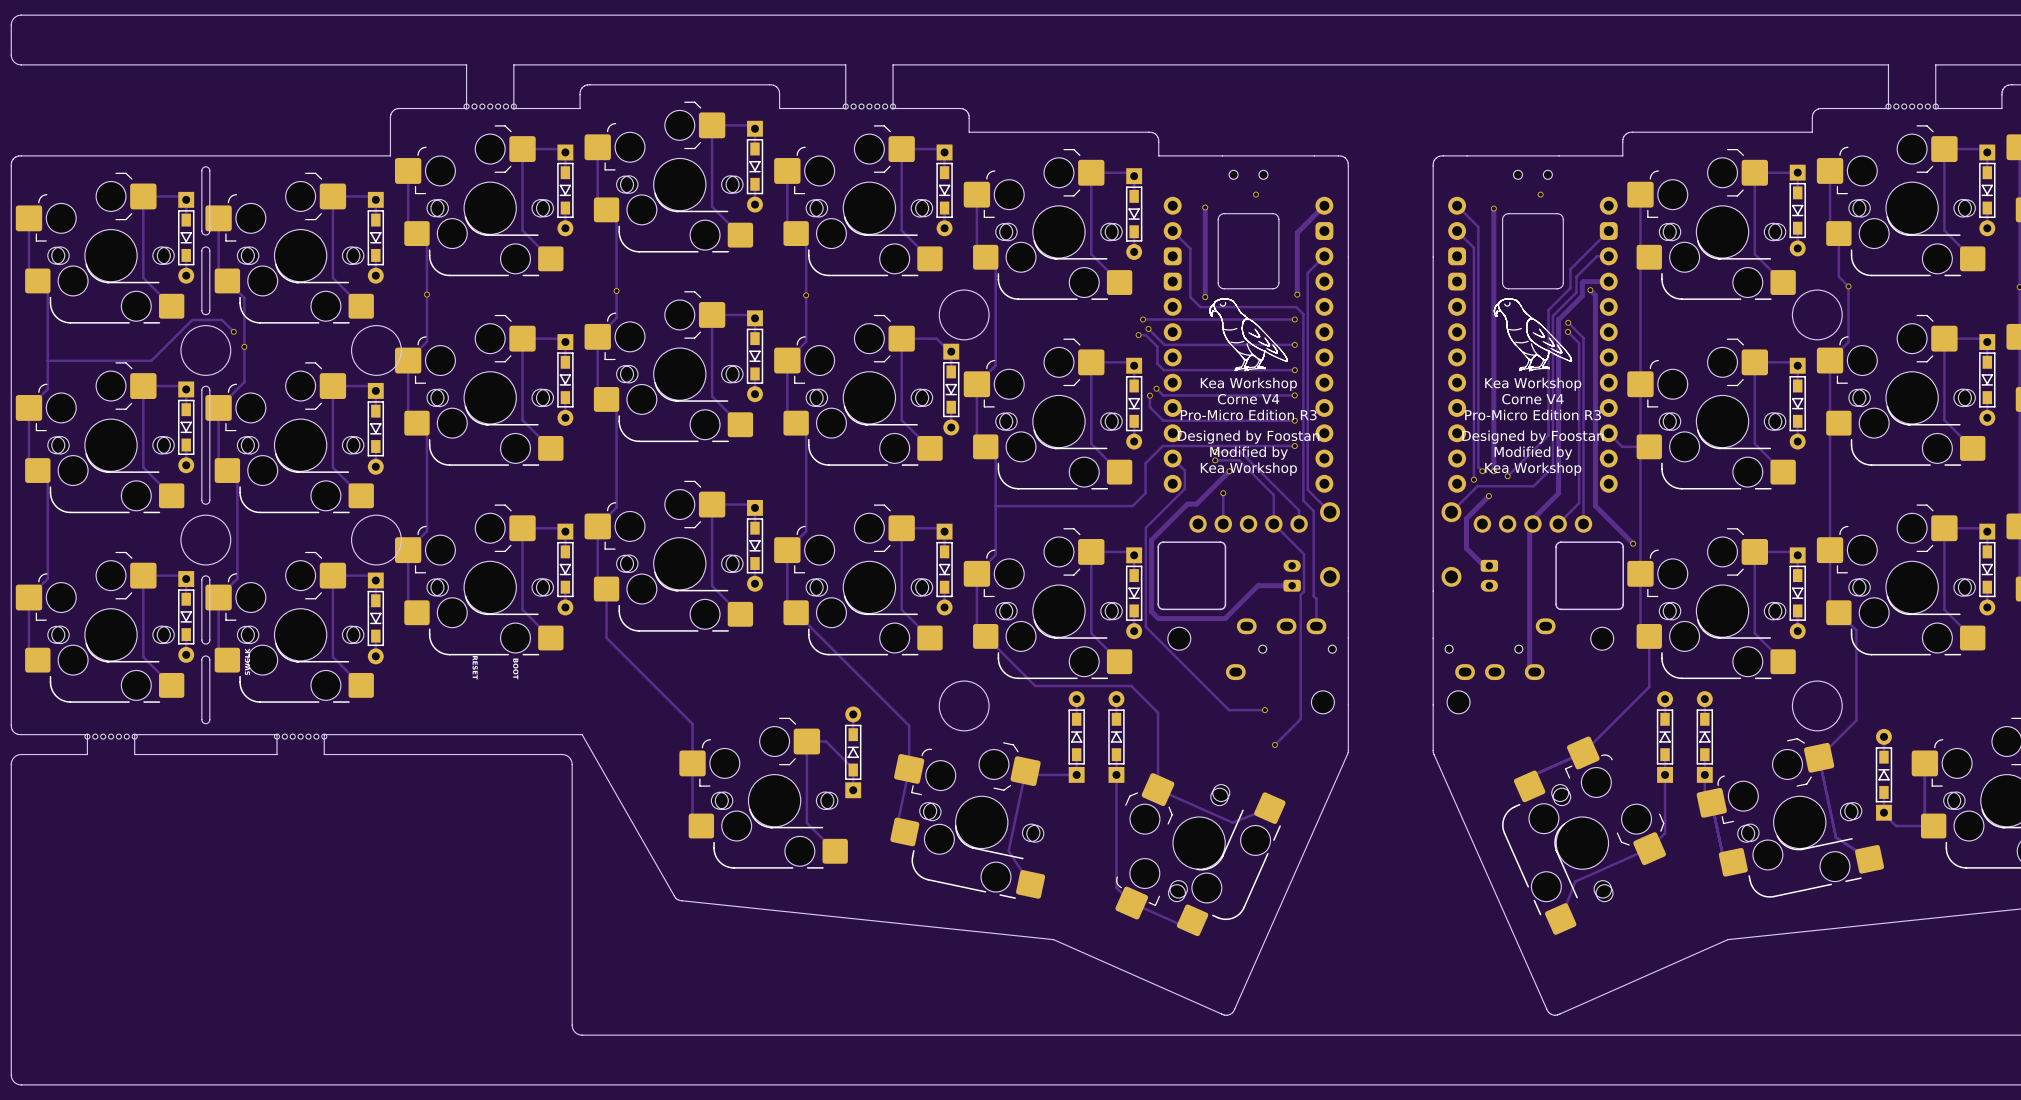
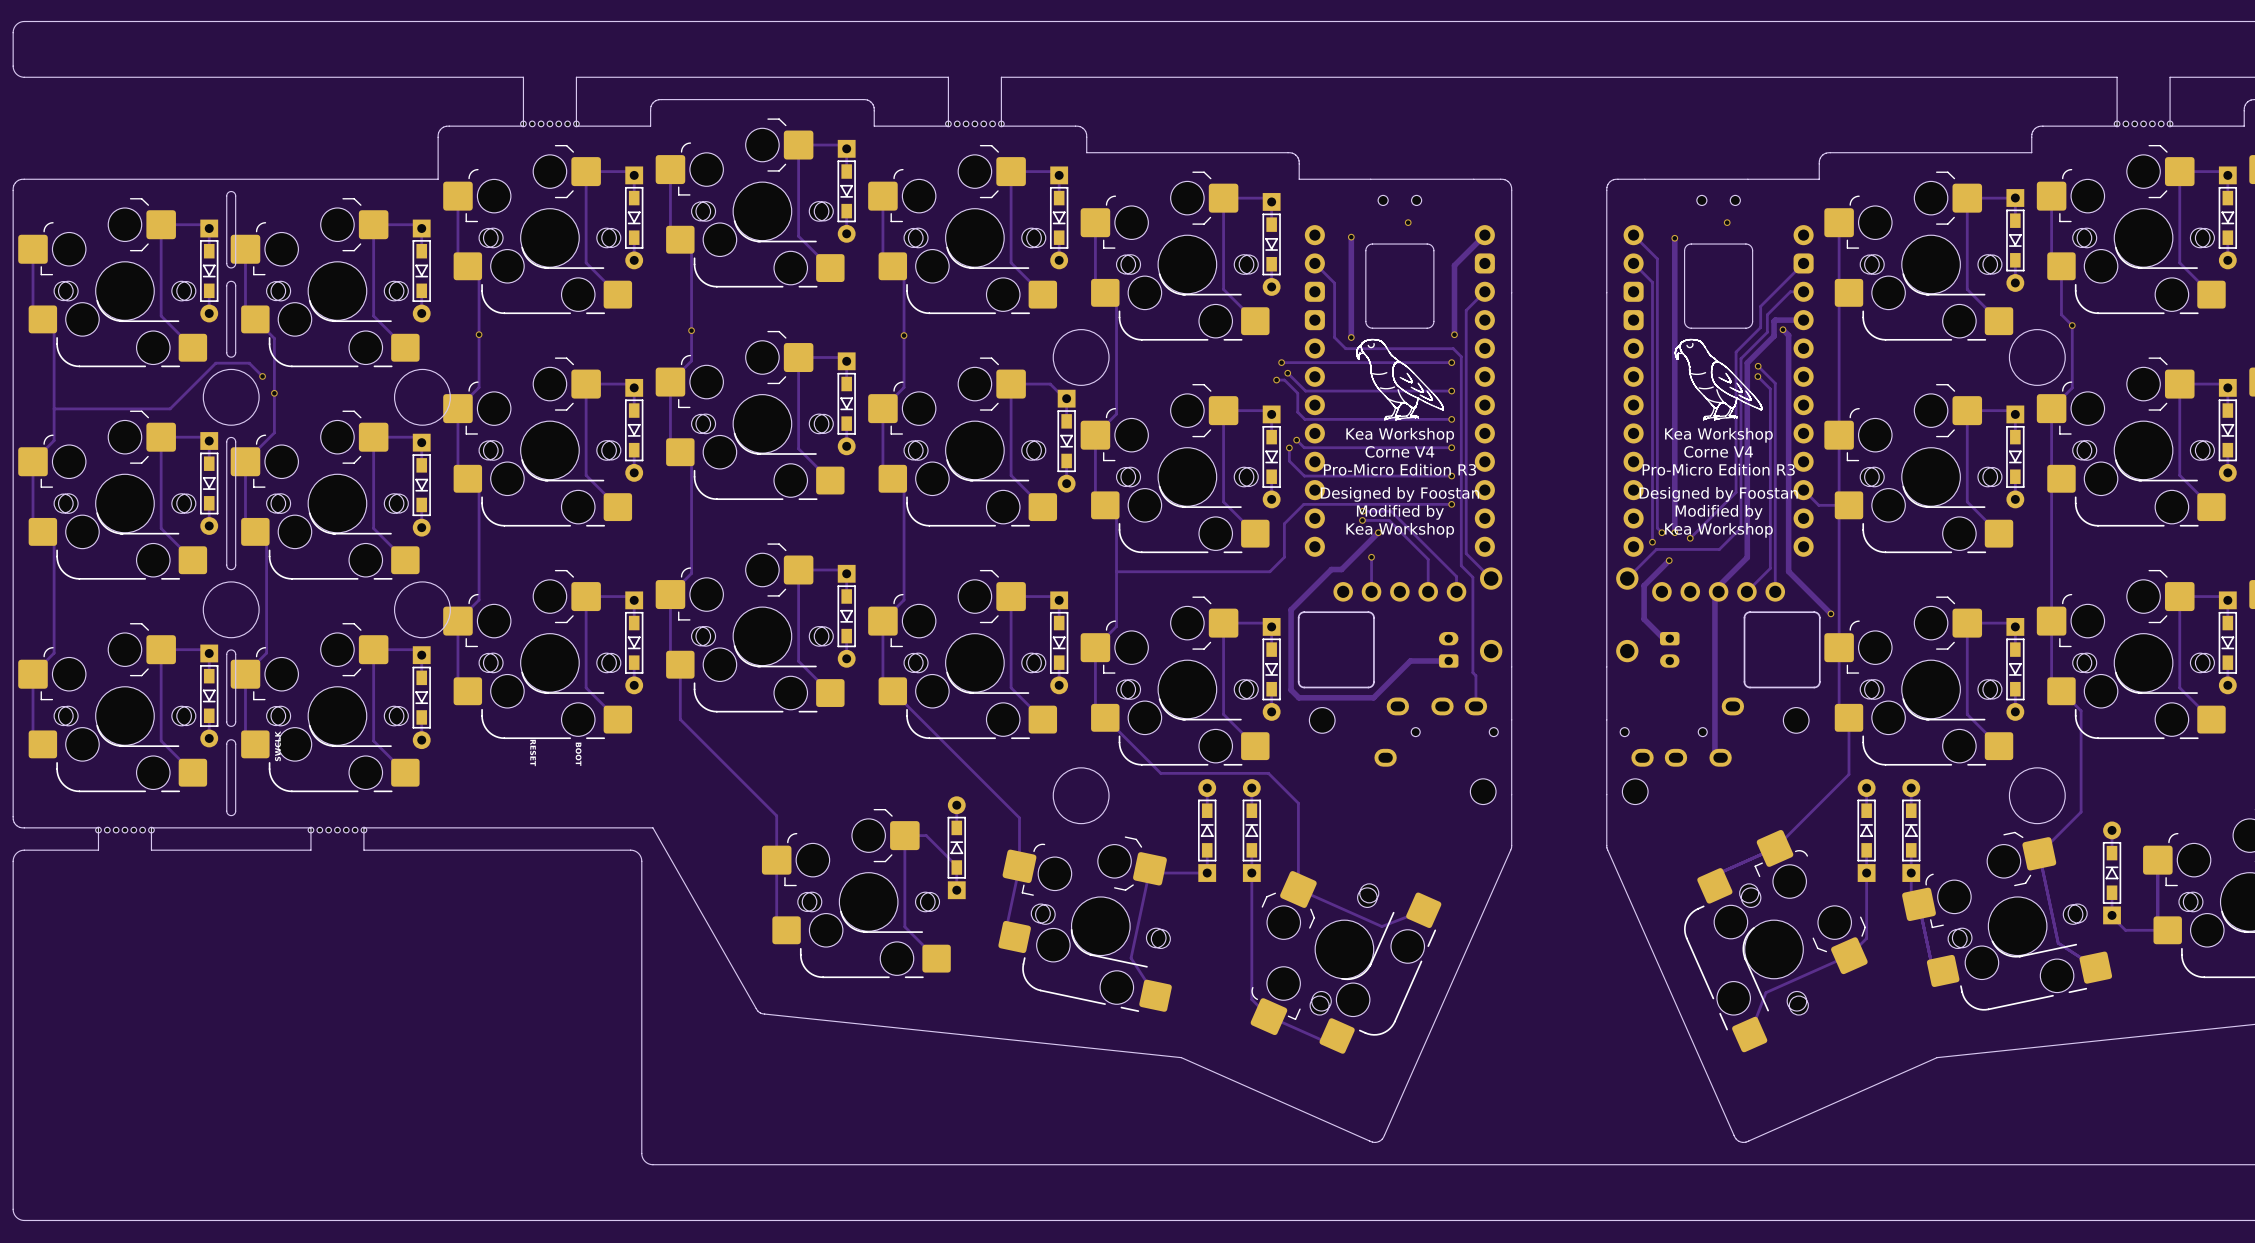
track: (1172, 458) (1184, 470) (1184, 488) (1145, 527) (1145, 626) (1229, 710) (1264, 710) -> none
track: (1273, 524) (1303, 554) (1303, 591) (1300, 594) (1300, 719) (1274, 744) -> none
via: (1264, 710) -> none
via: (1274, 744) -> none

